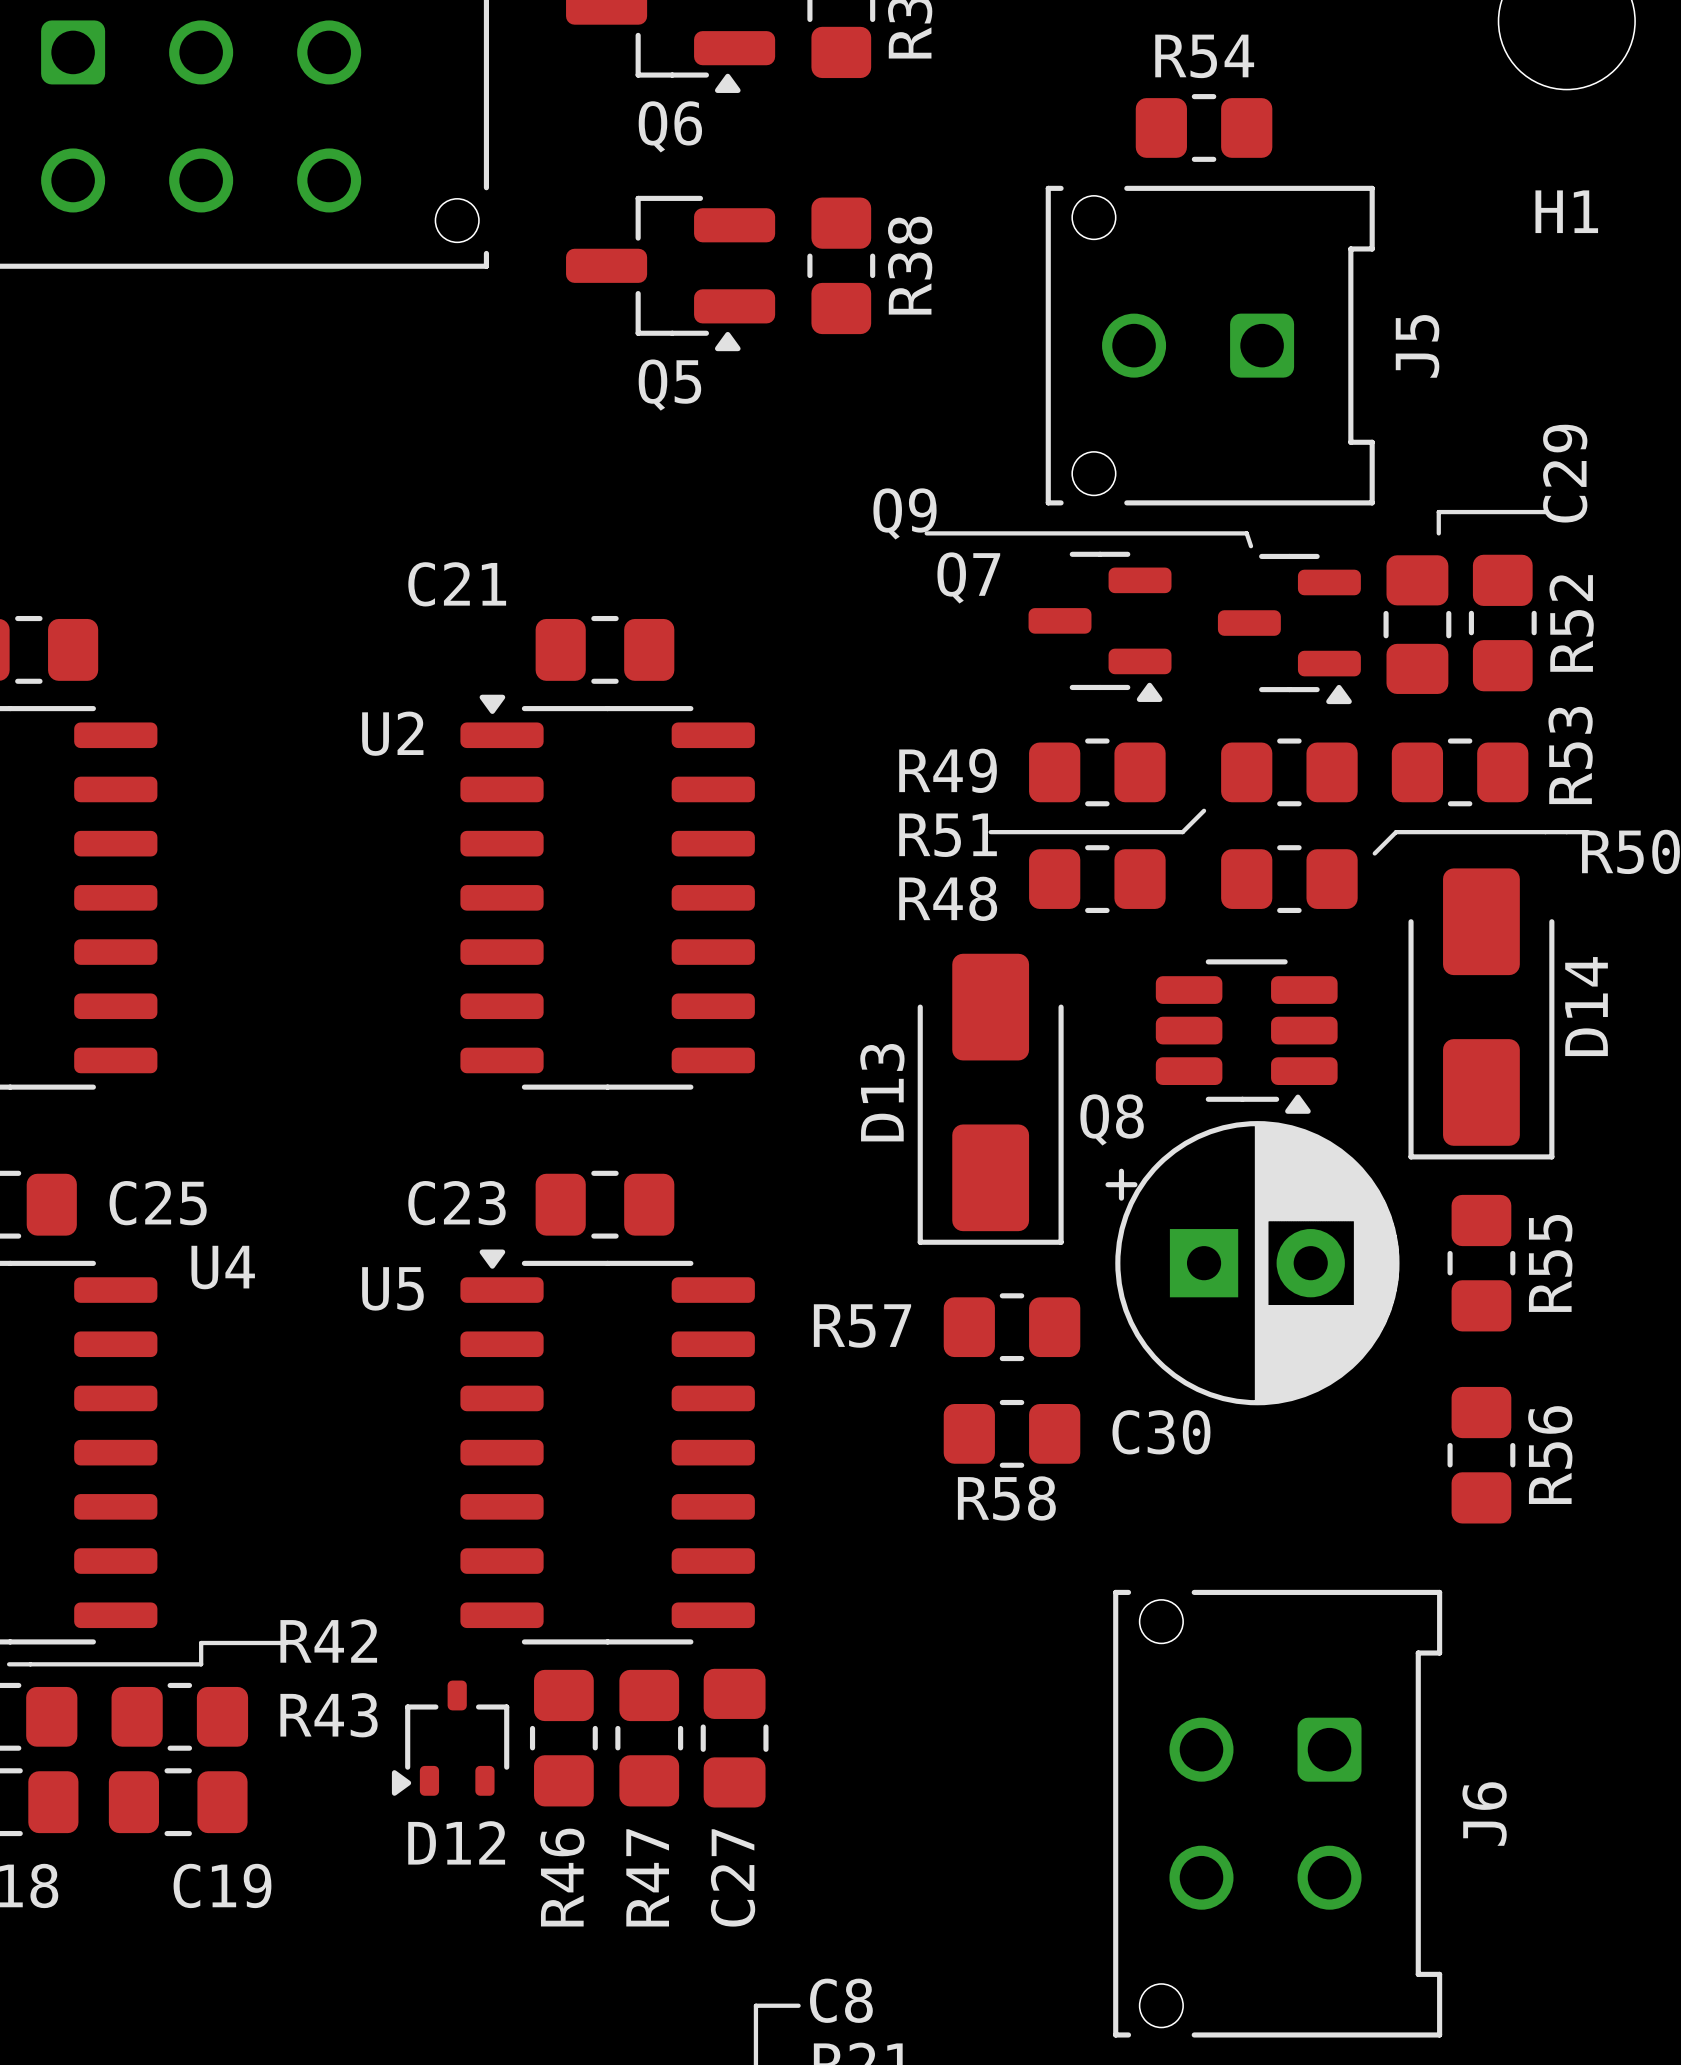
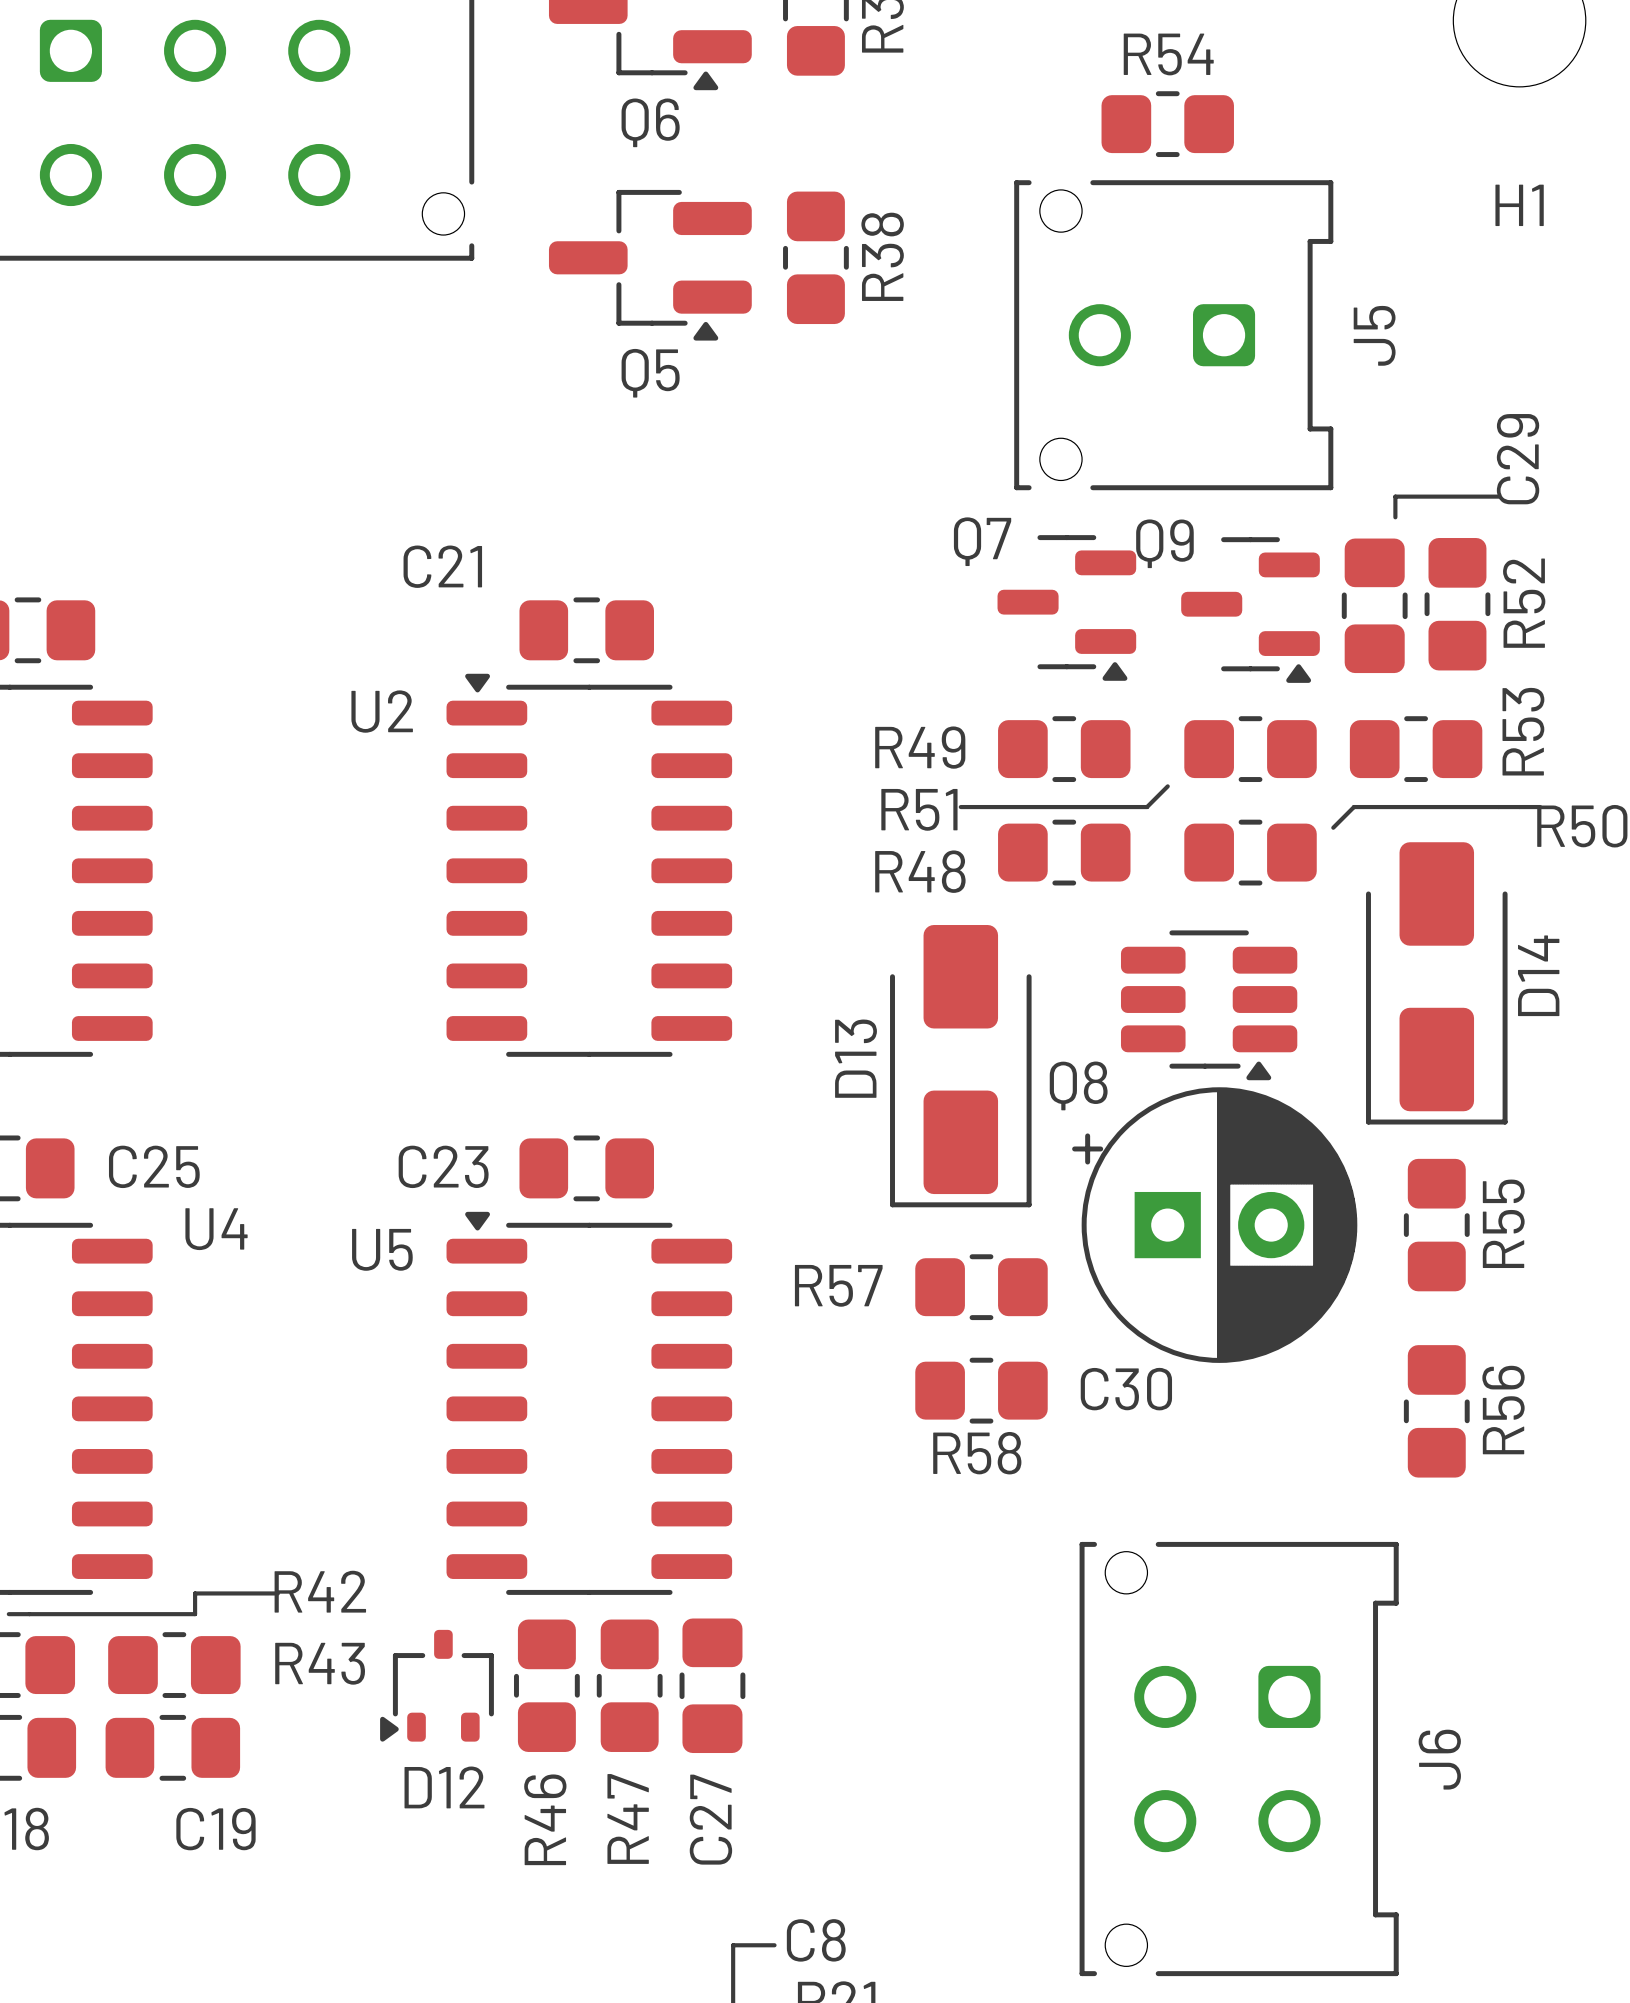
Q9 name position: Q9 (905, 513) -> Q9 (1164, 543)
line: (926, 533) (1246, 533) (1250, 546) -> none
Q7 name position: Q7 (968, 577) -> Q7 (982, 541)

